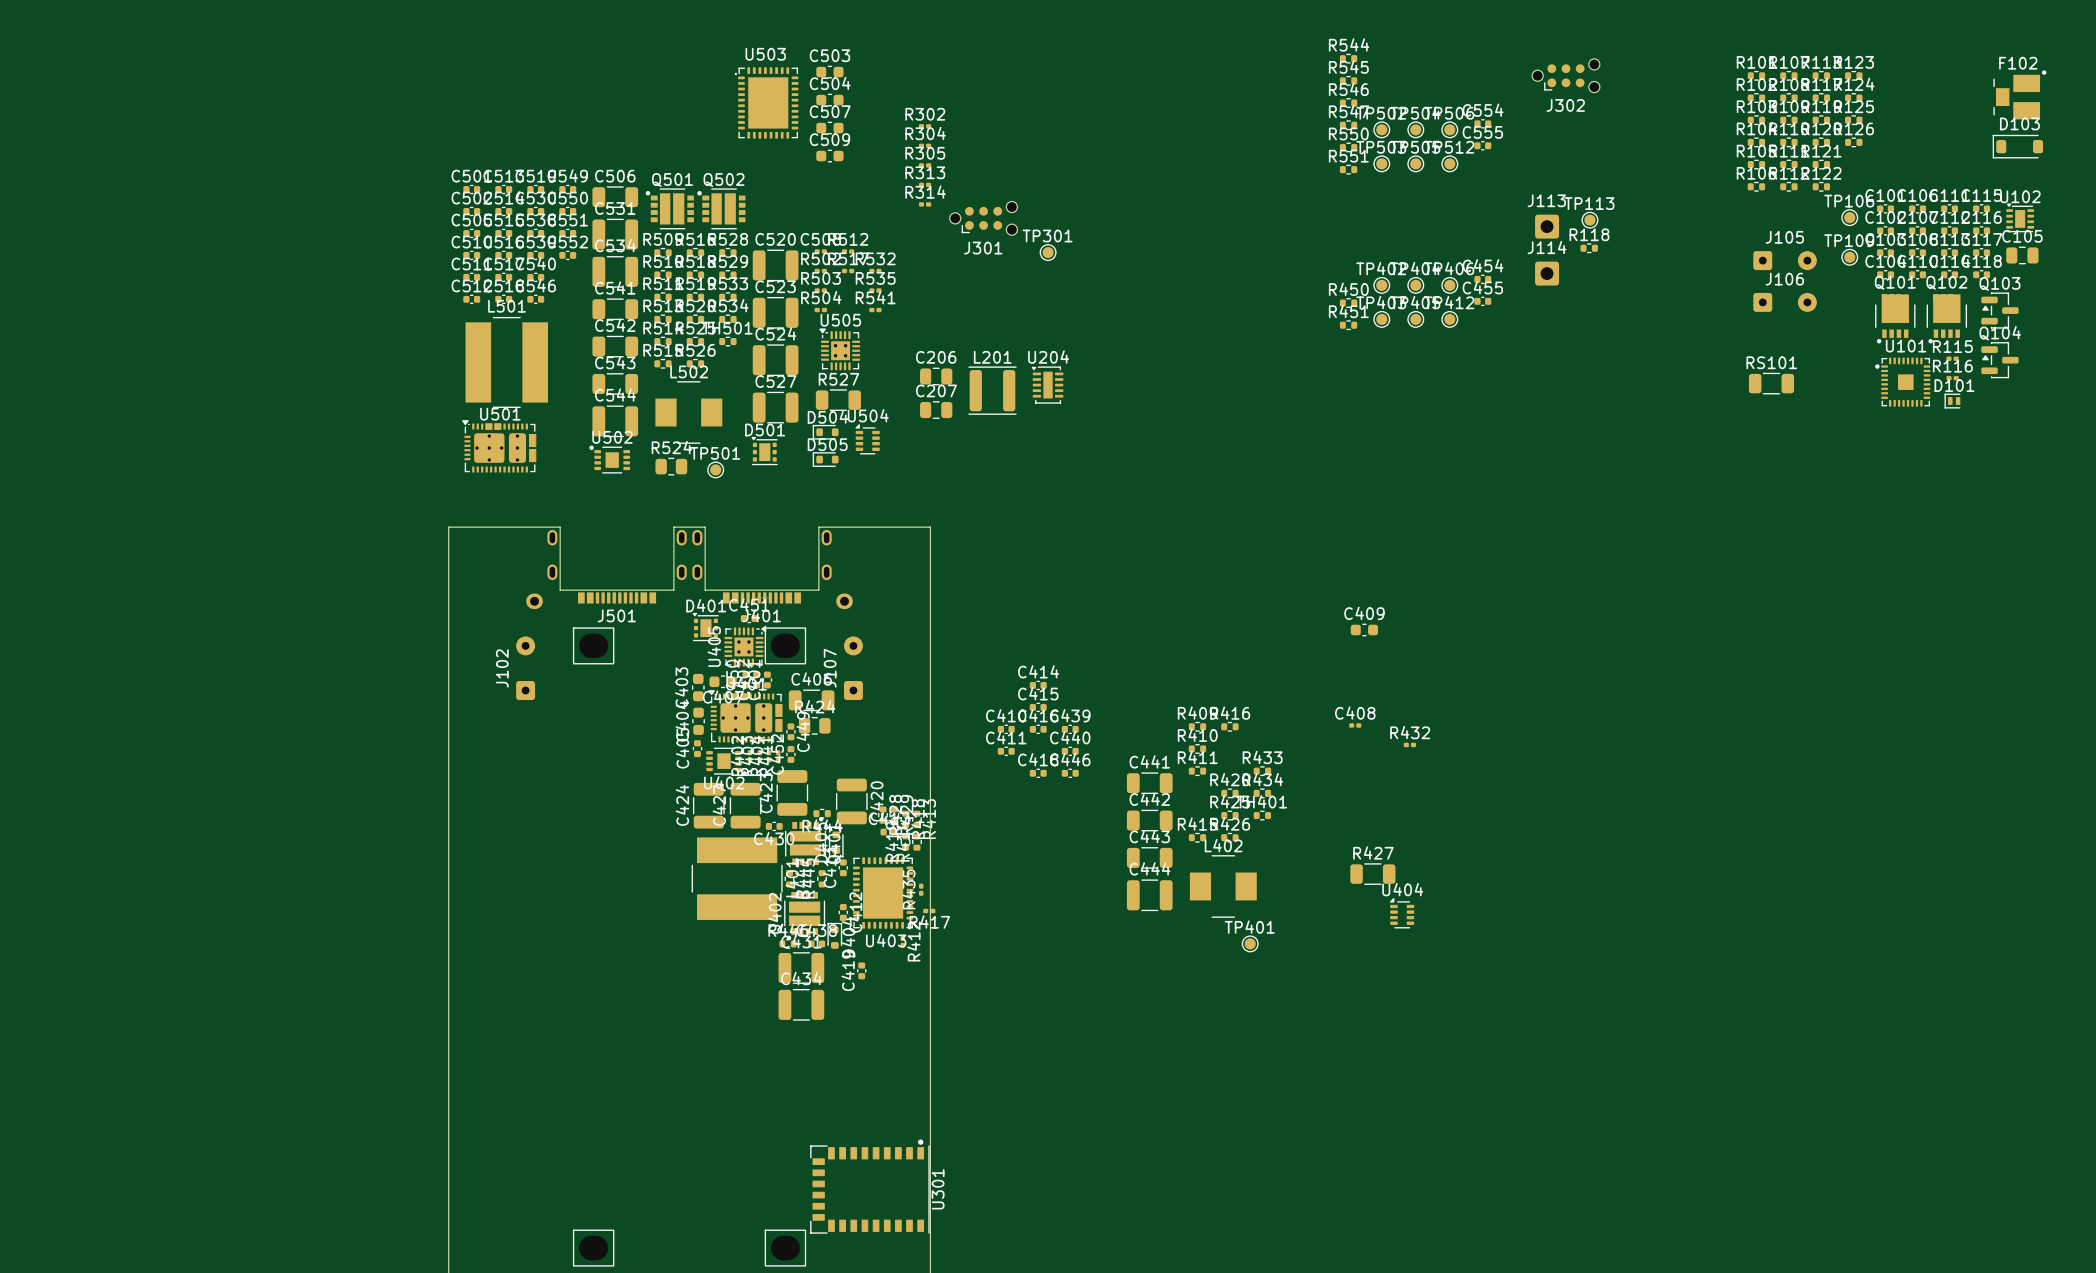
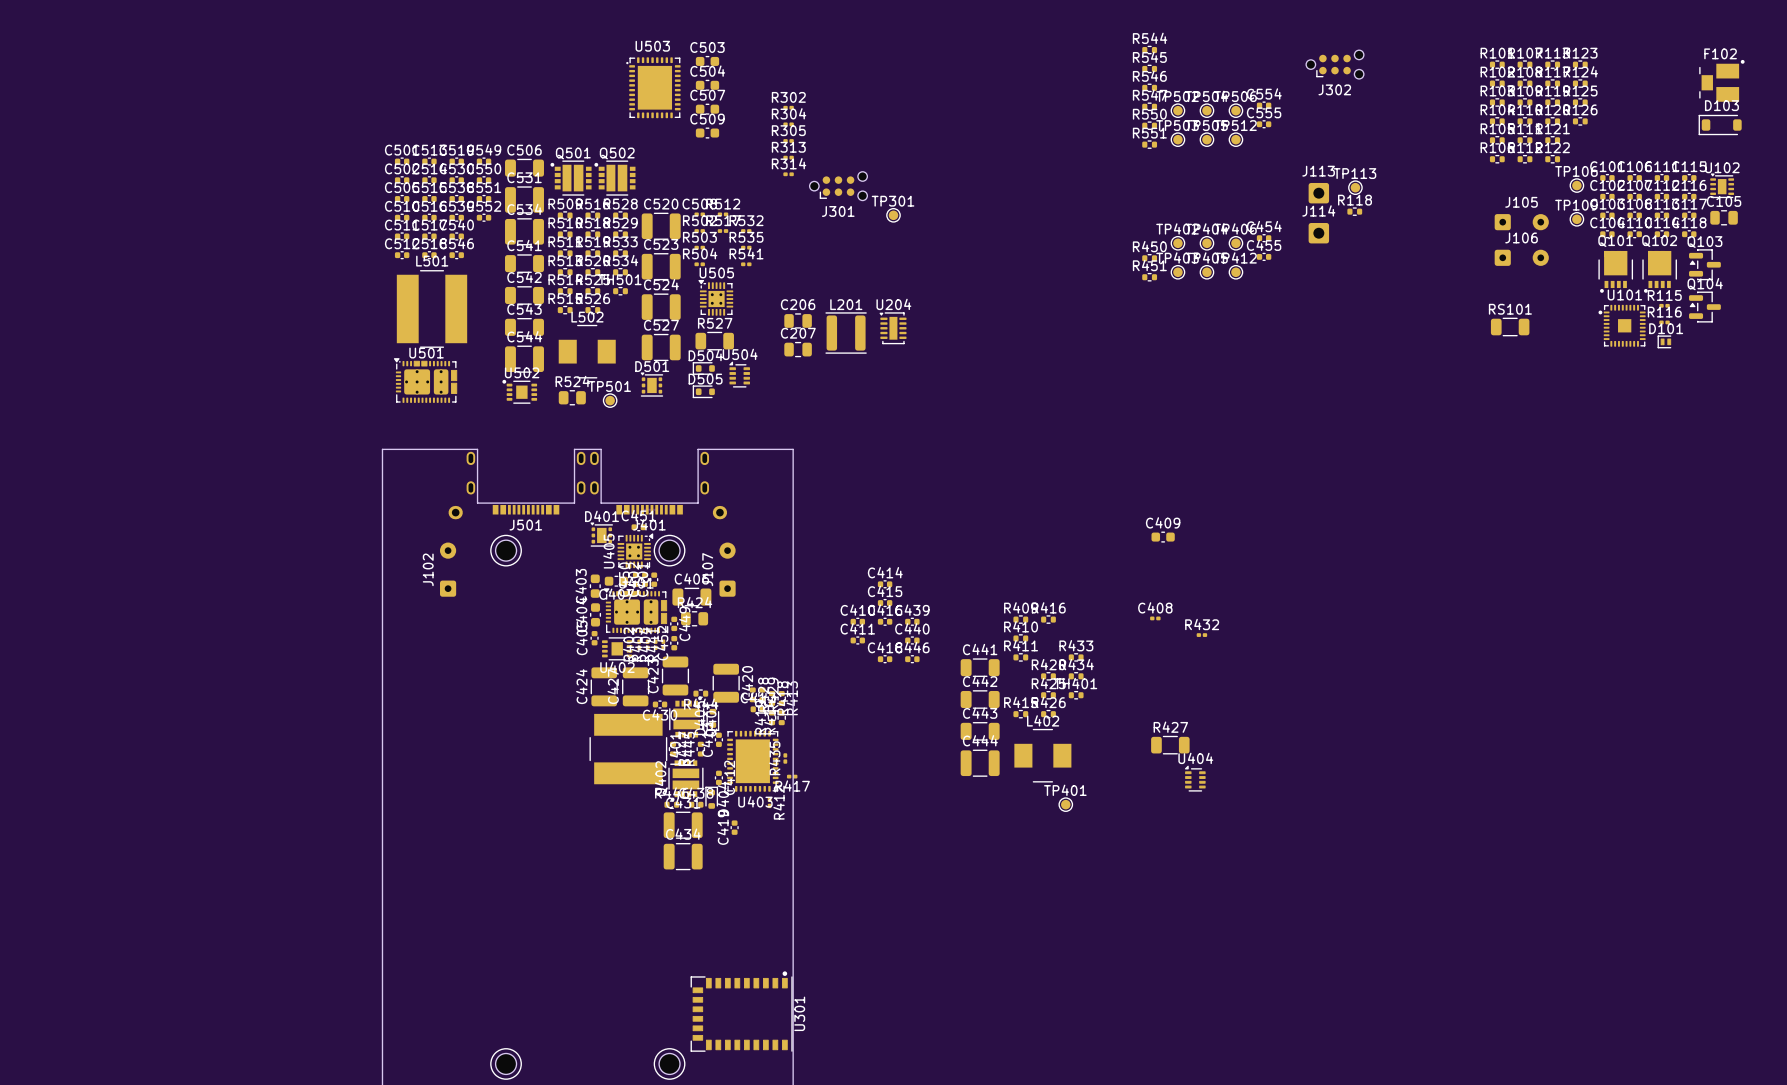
part footprint: [572, 627, 615, 665] -> [490, 534, 522, 567]
part footprint: [764, 627, 807, 665] -> [653, 534, 686, 567]
part footprint: [572, 1229, 615, 1267] -> [490, 1048, 522, 1080]
part footprint: [764, 1229, 807, 1267] -> [653, 1048, 686, 1080]

